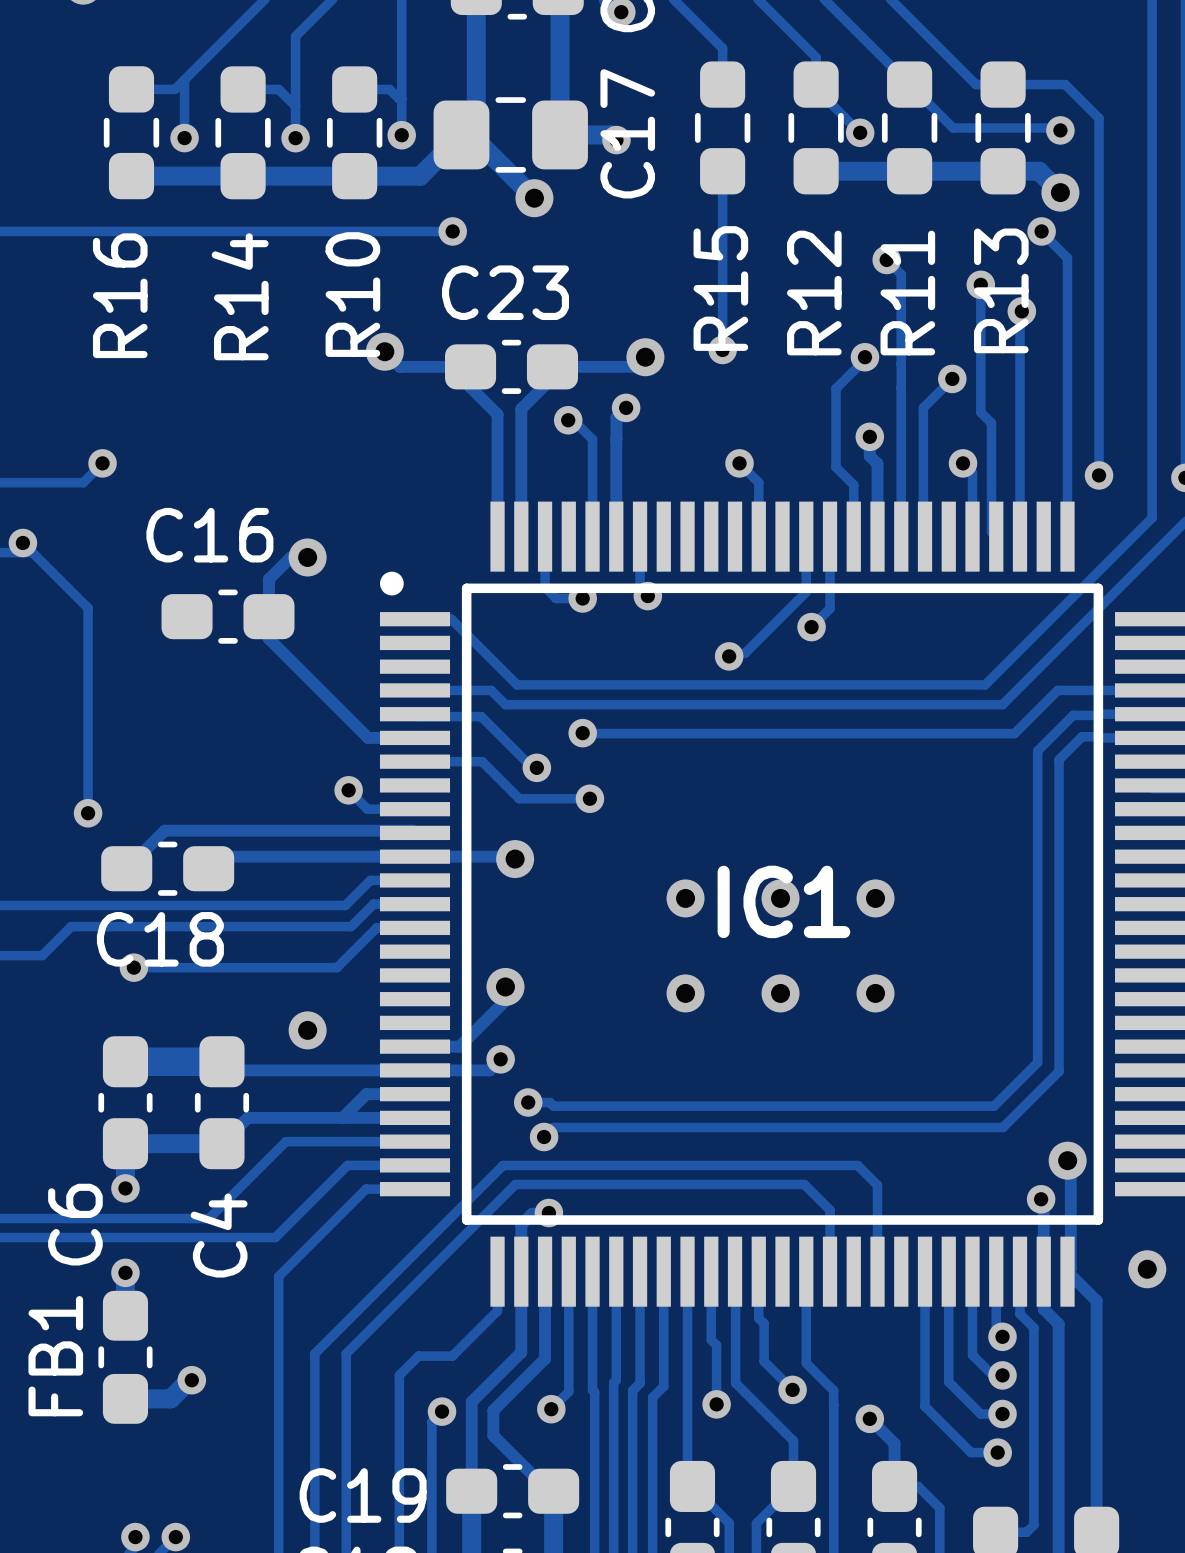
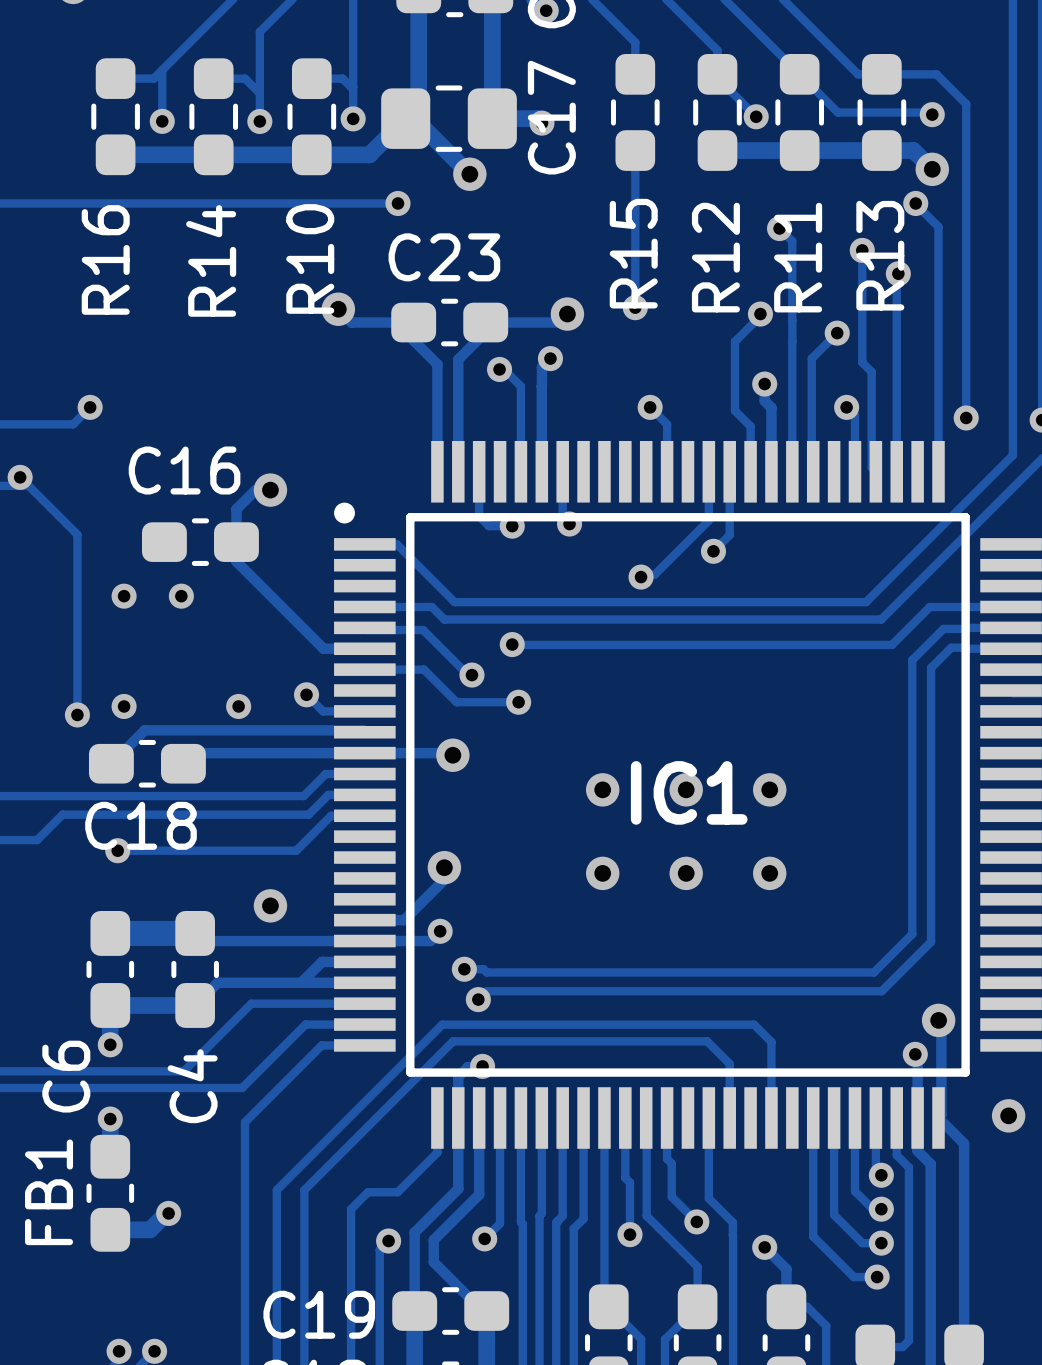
via: none -> (124, 596)
via: none -> (181, 596)
via: none -> (124, 706)
via: none -> (238, 706)

